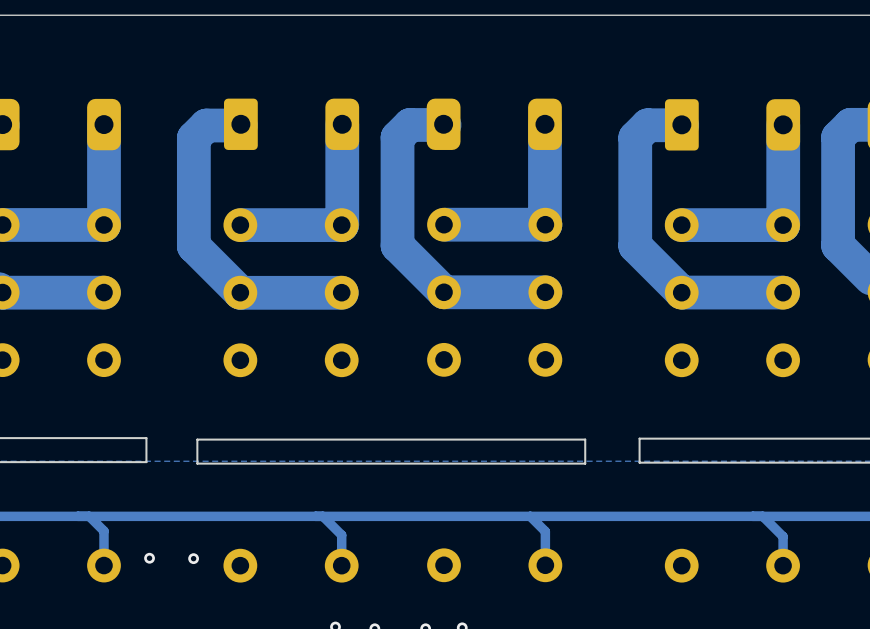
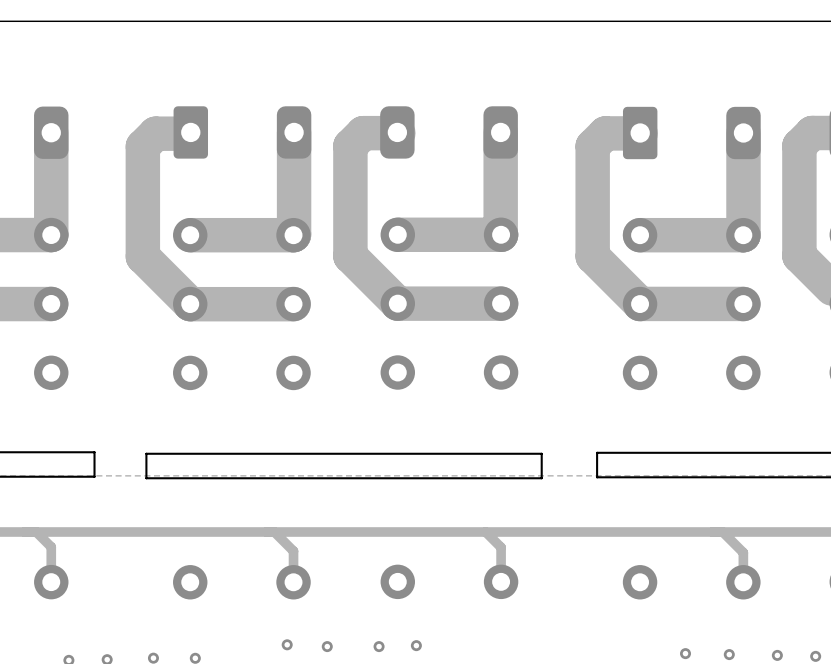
via: (149, 558) -> none
via: (193, 558) -> none

